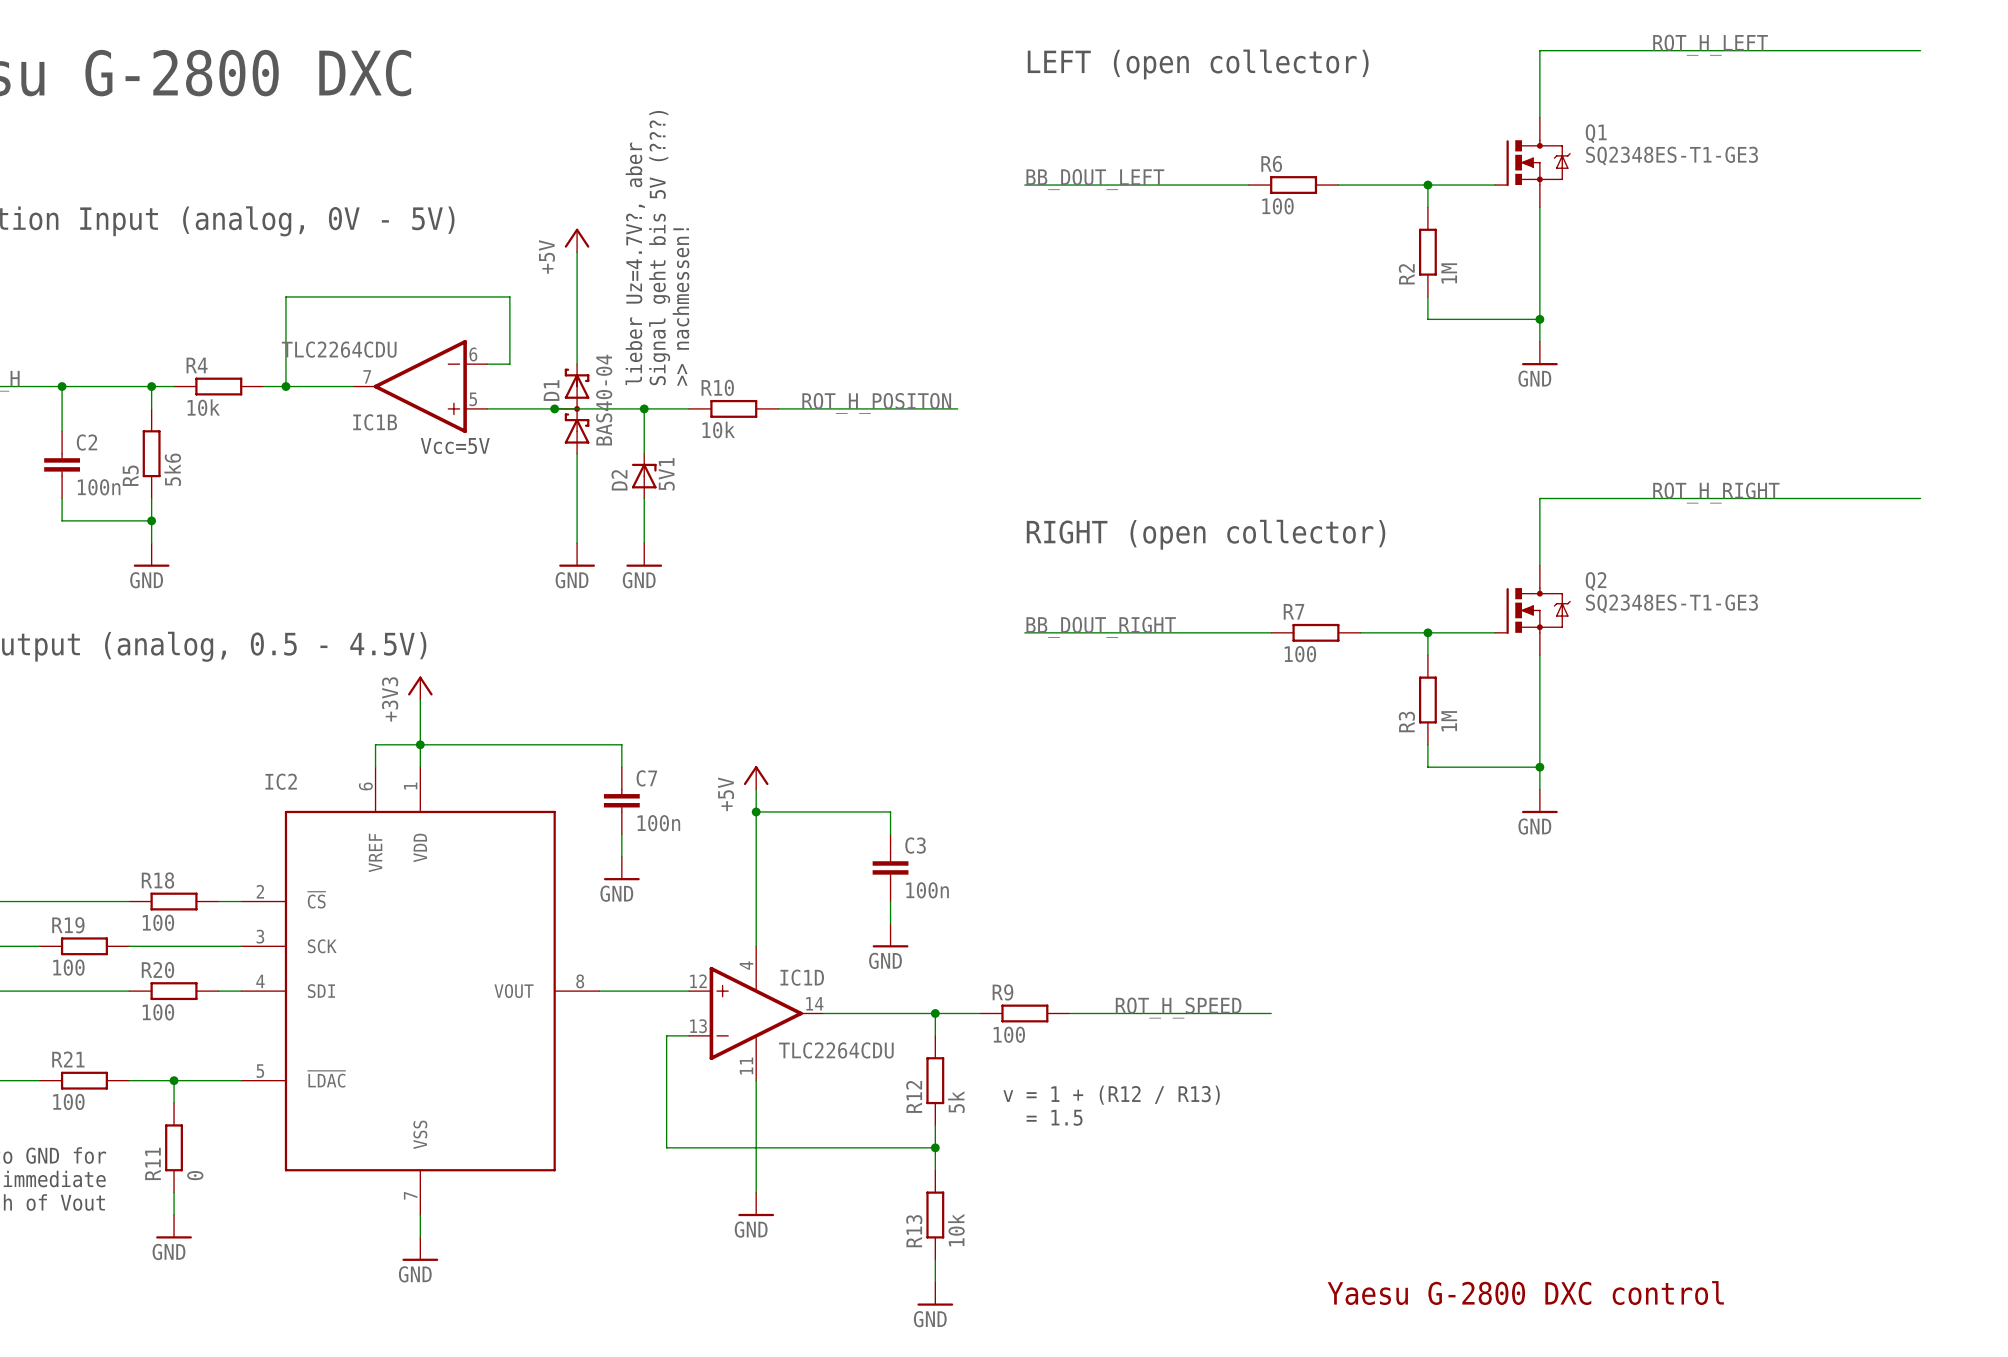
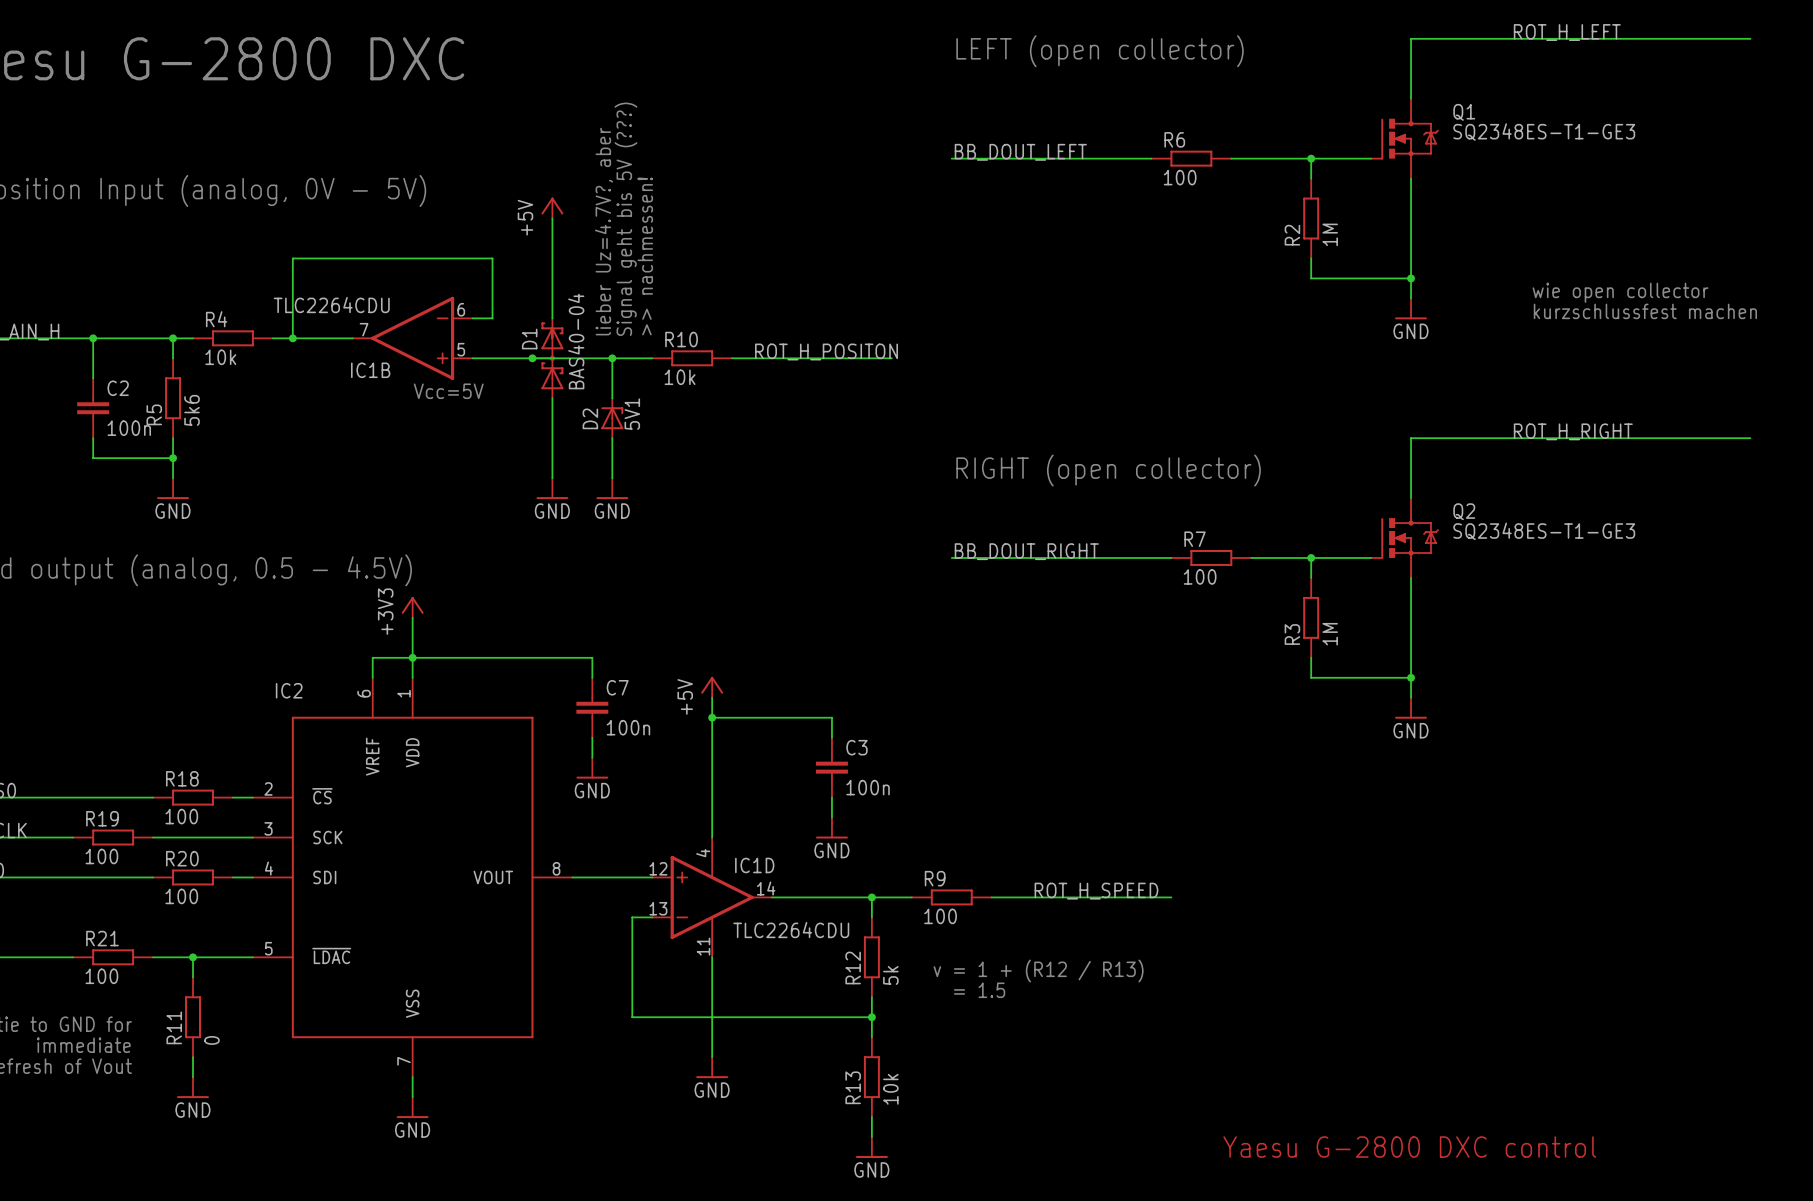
text: none -> wie open collector (1620, 292)
text: none -> kurzschlussfest machen (1645, 311)

